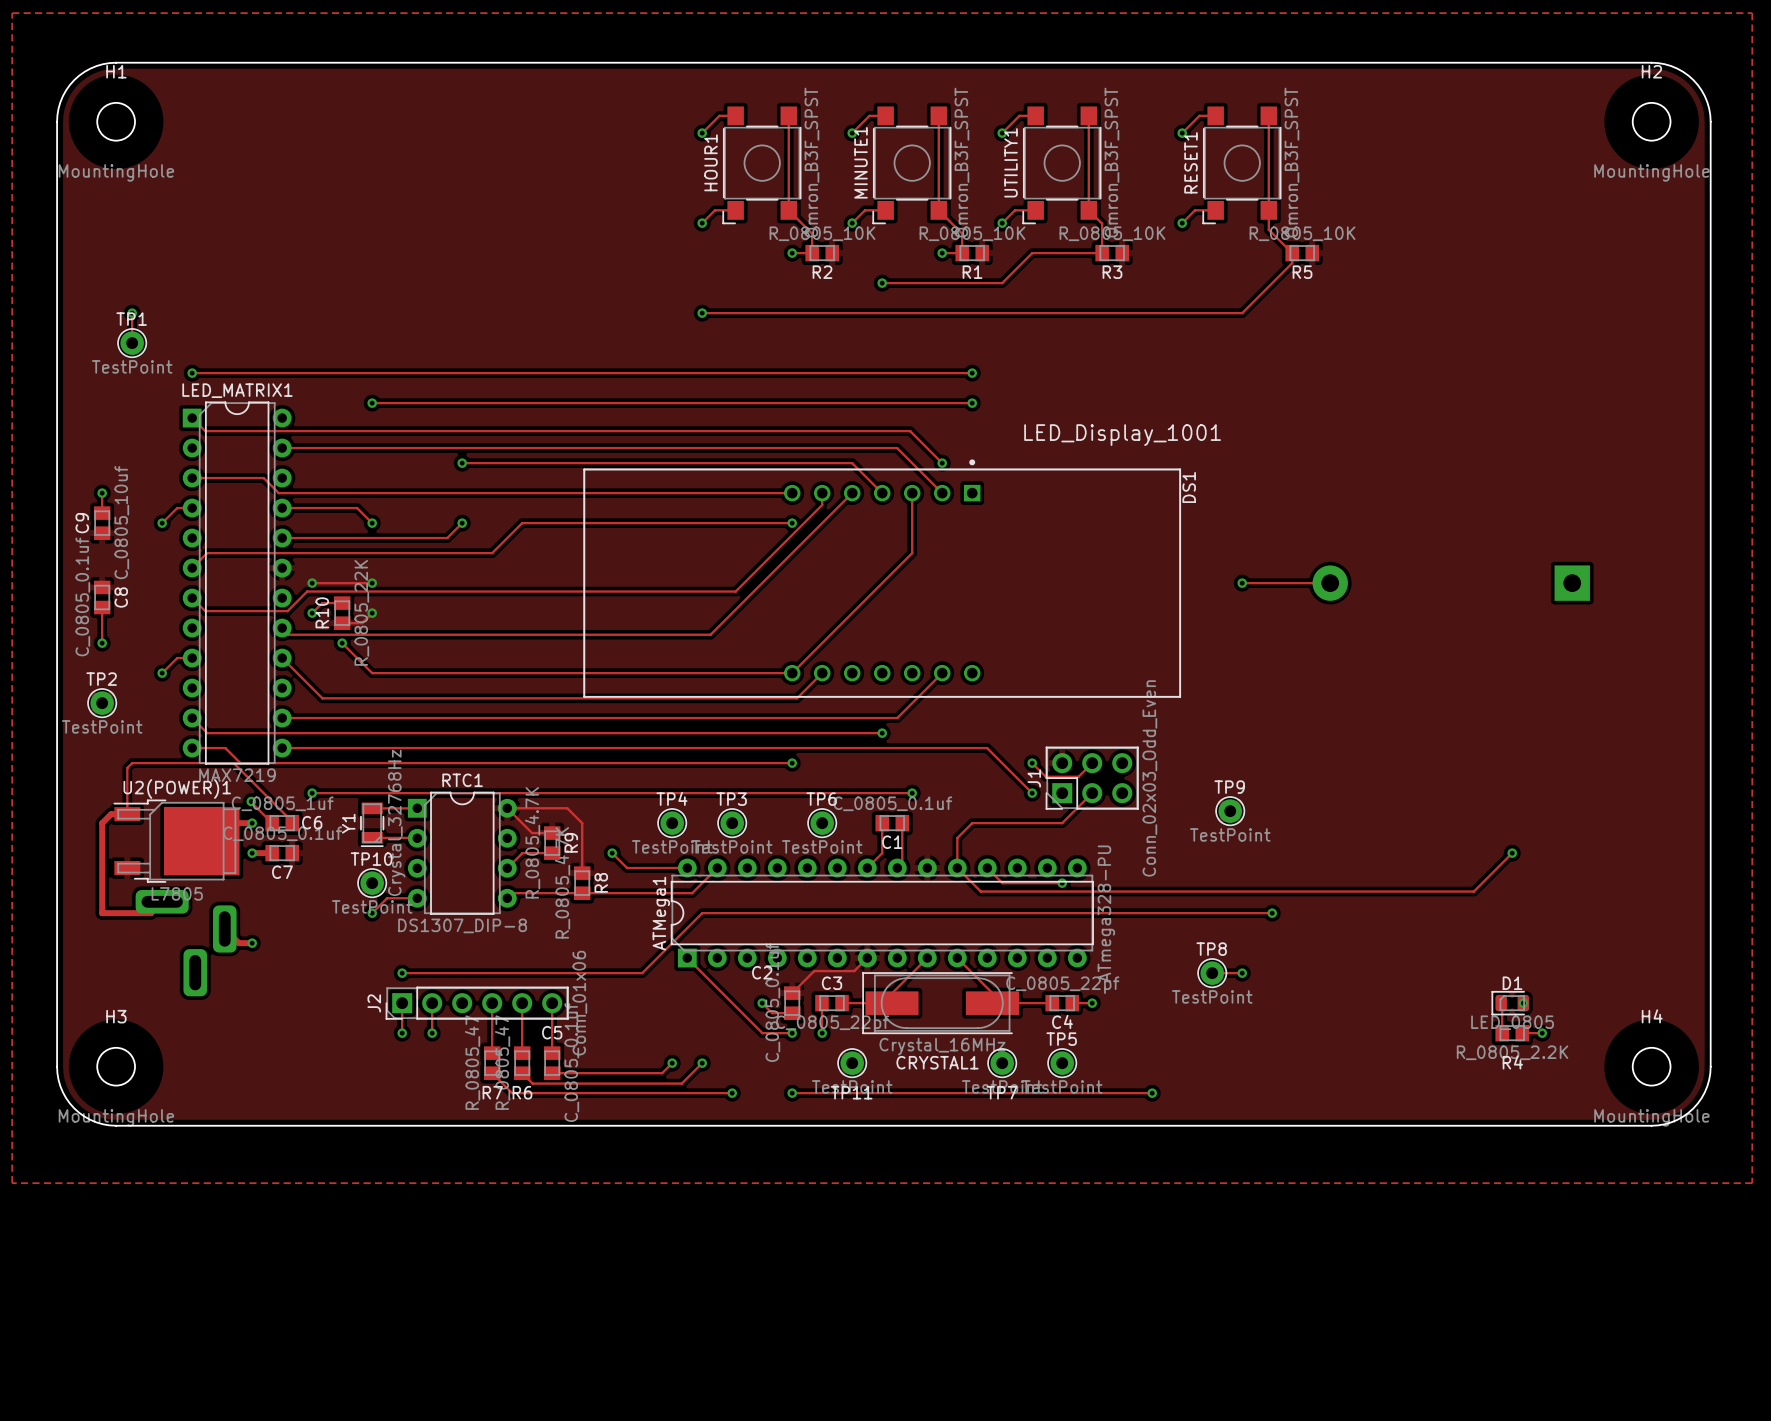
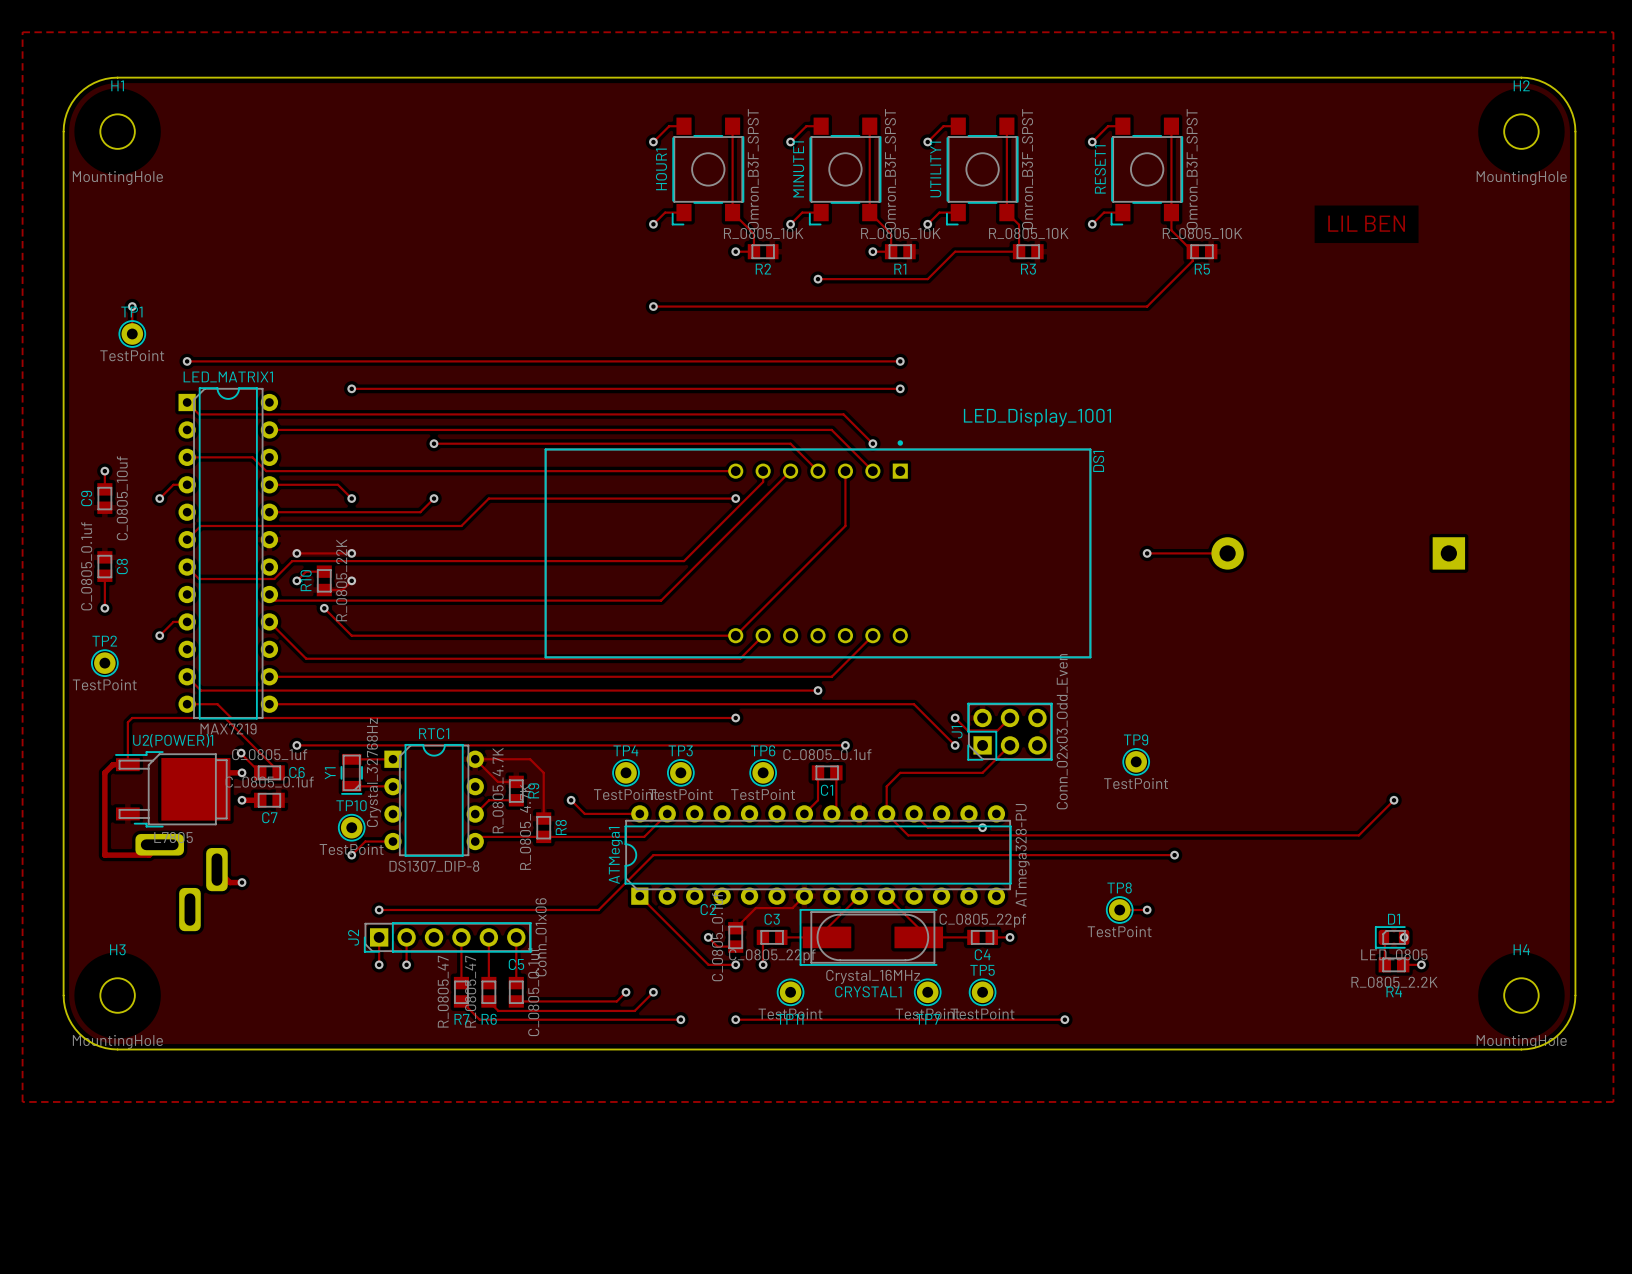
text: none -> LIL BEN (1366, 223)

